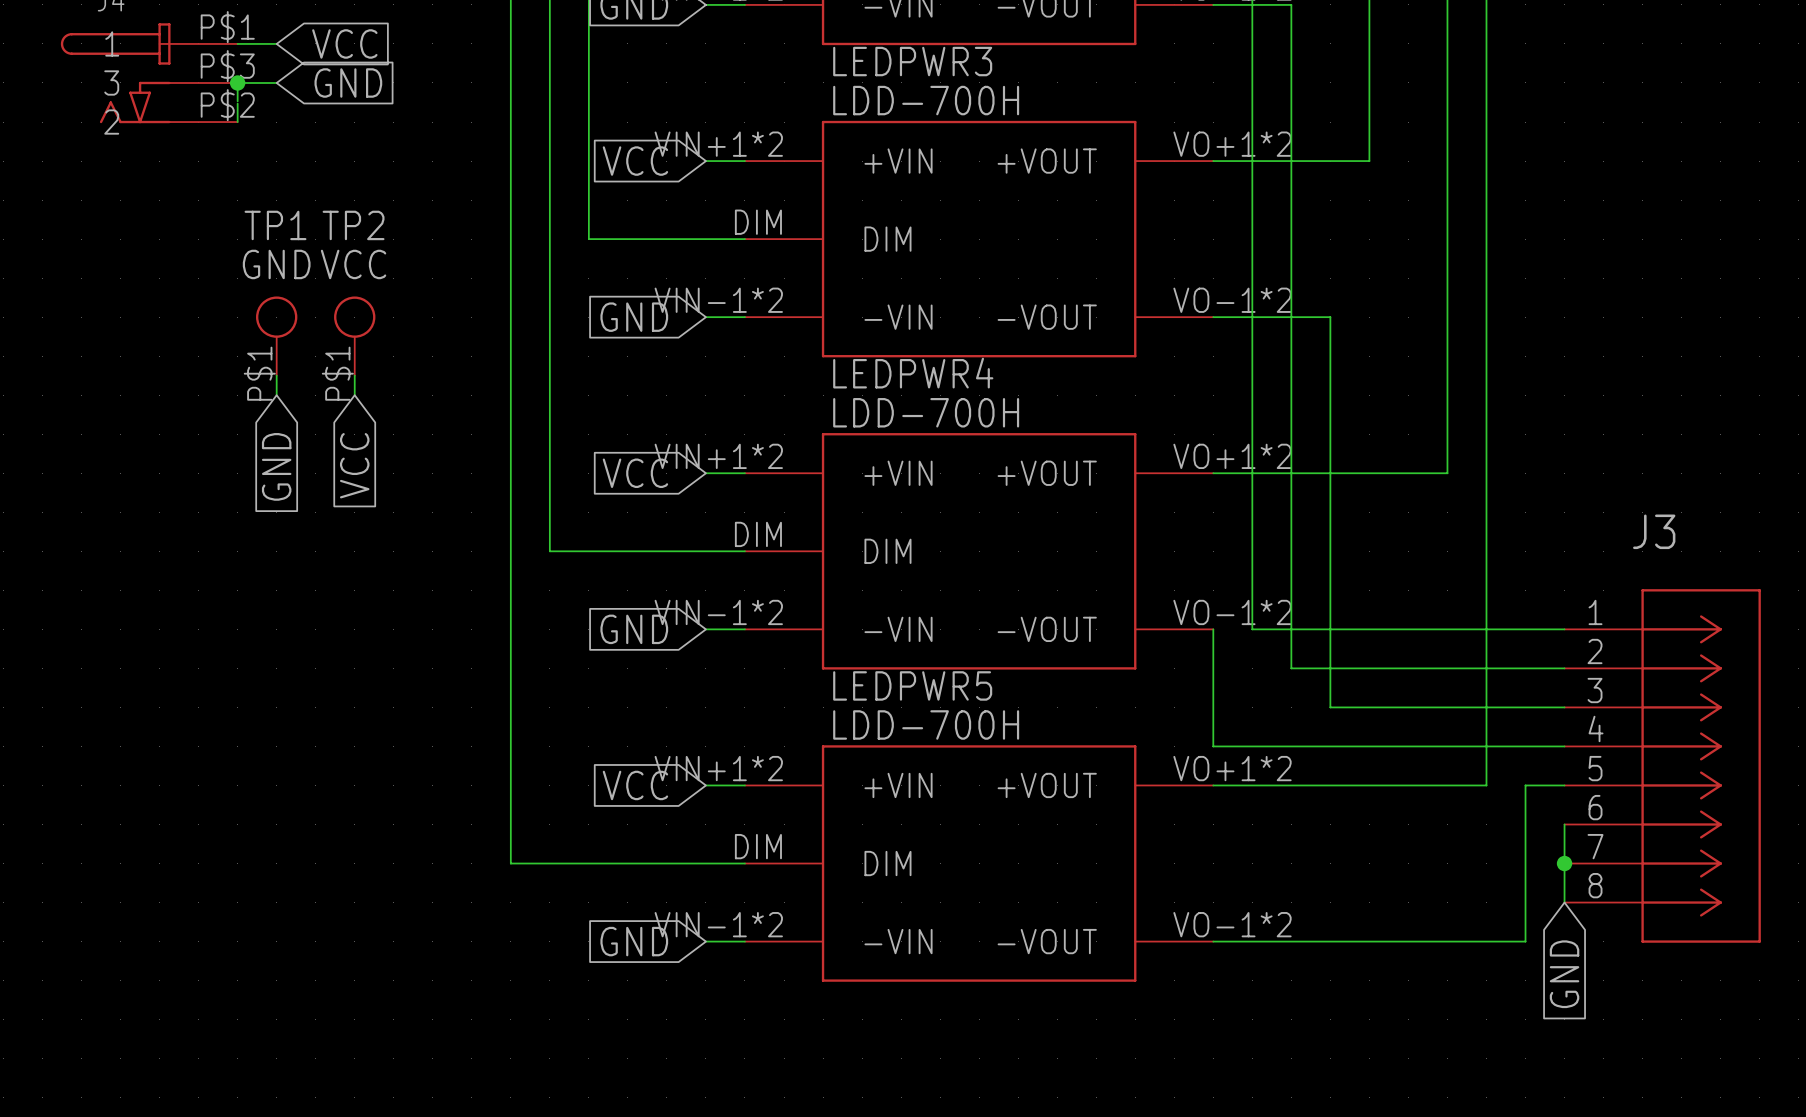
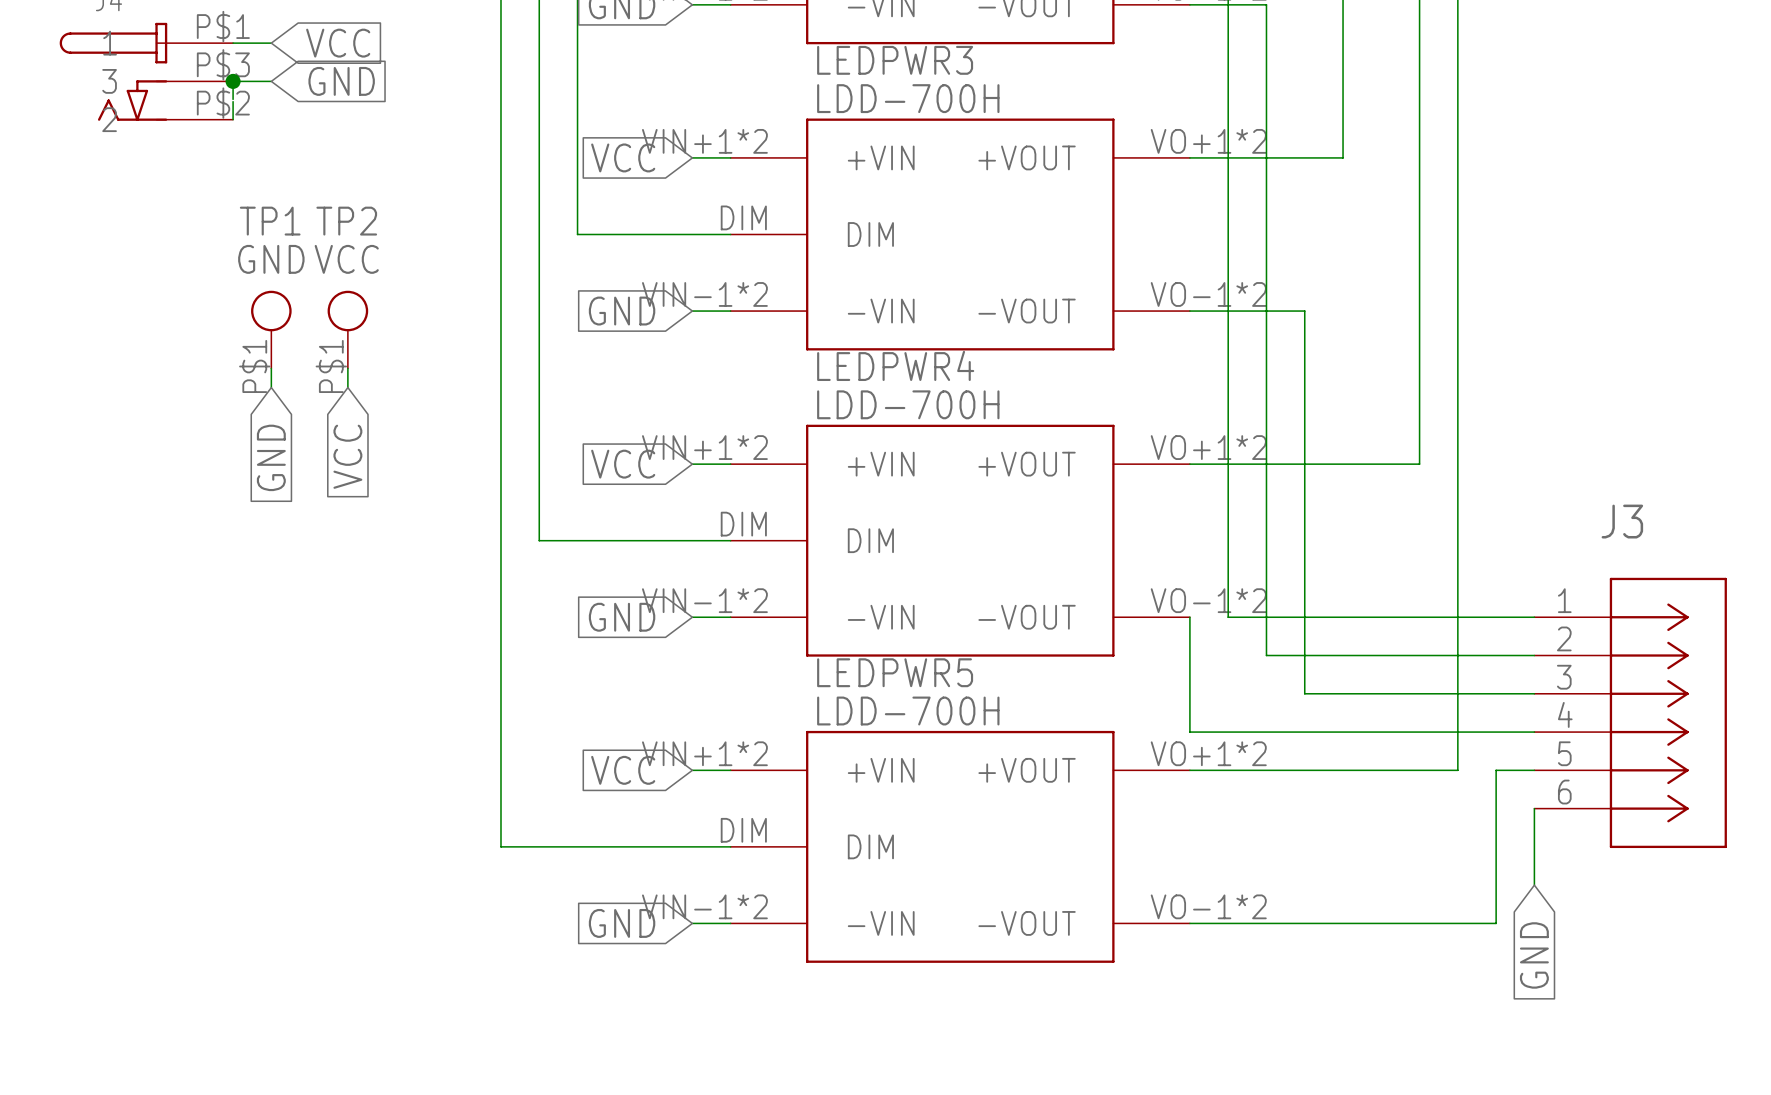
J3 symbol: [1564, 589, 1761, 943] -> [1534, 577, 1727, 849]
junction: (1564, 863) -> none

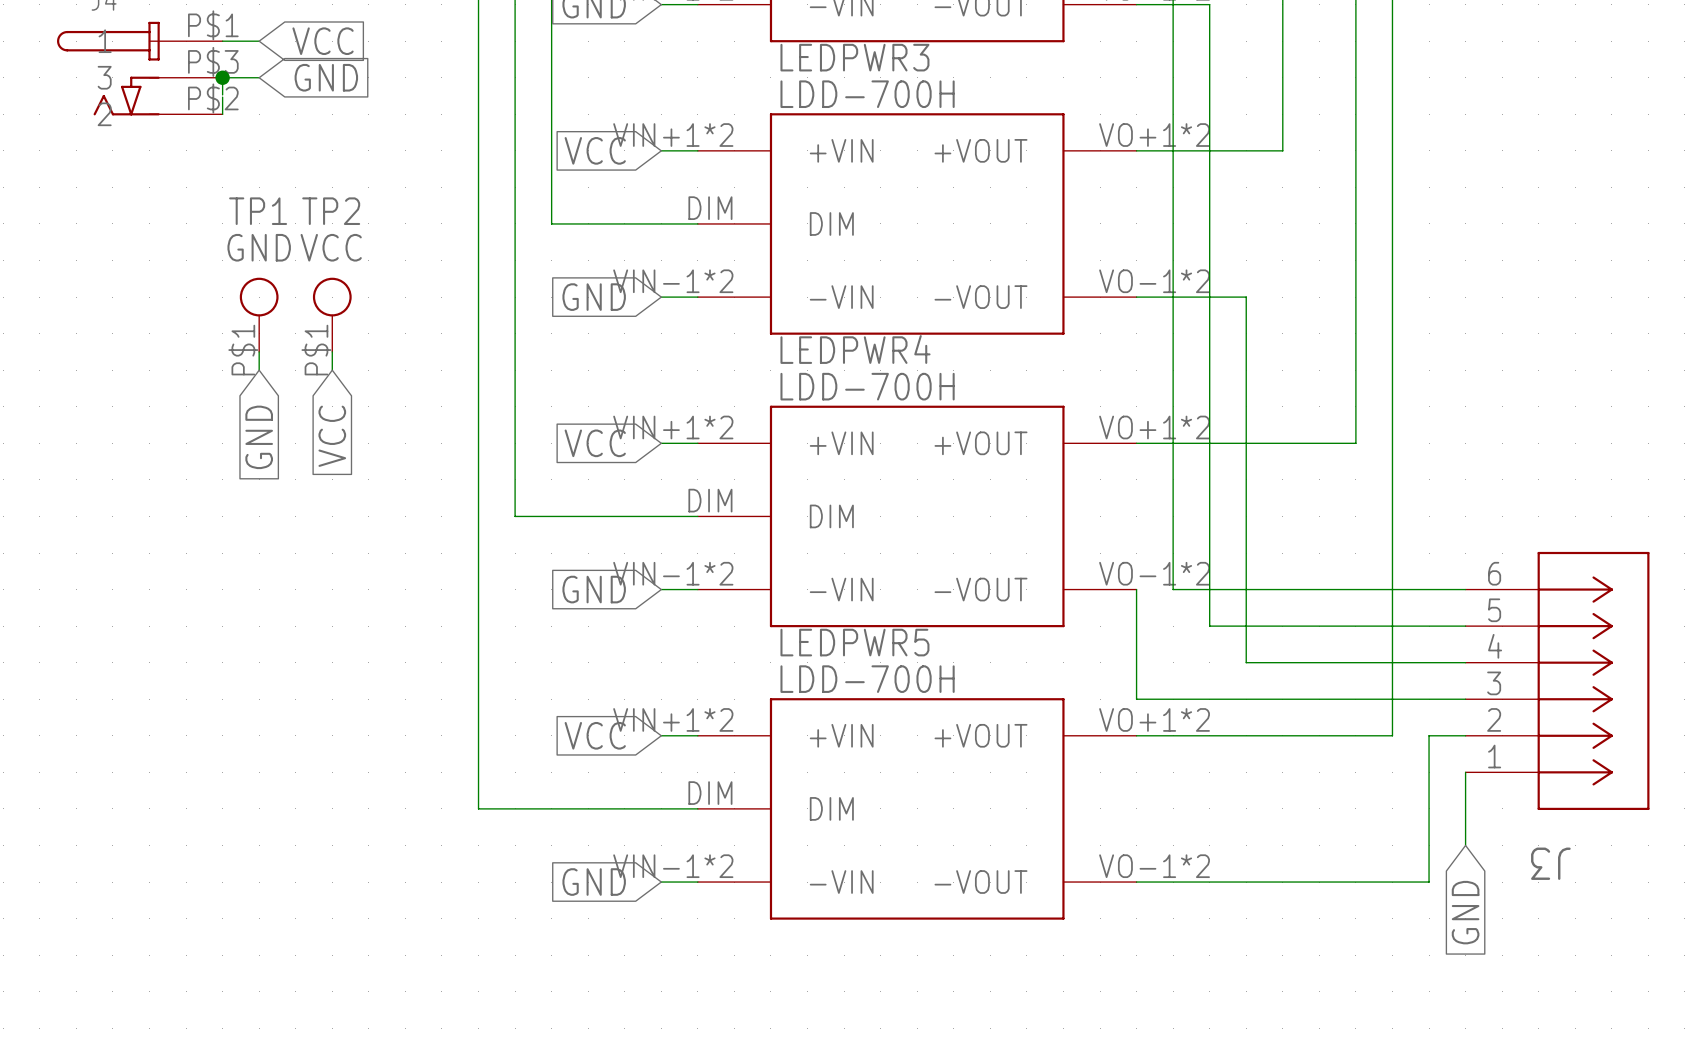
J3 flip: as is (1668, 712) -> up-down (1593, 680)

